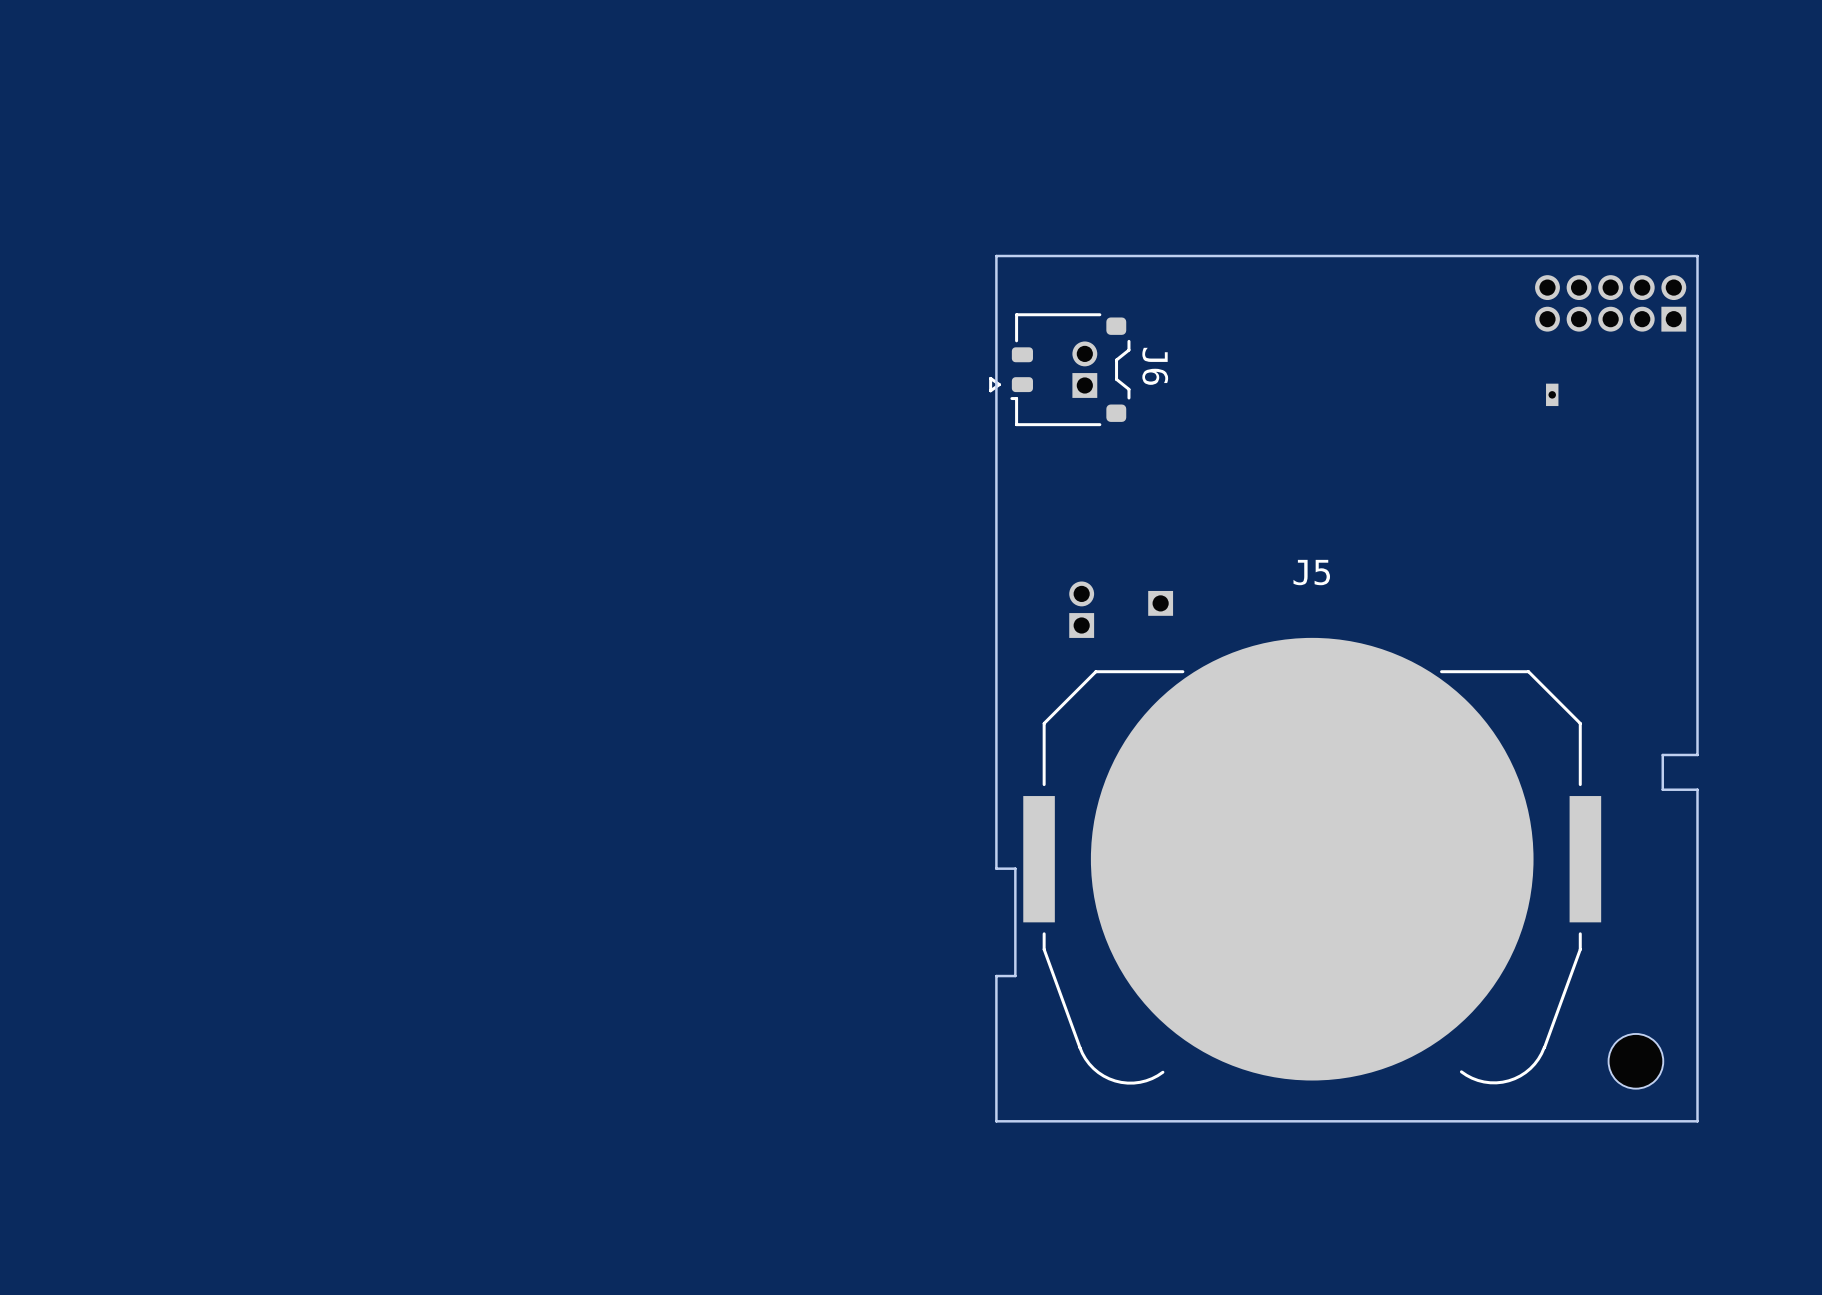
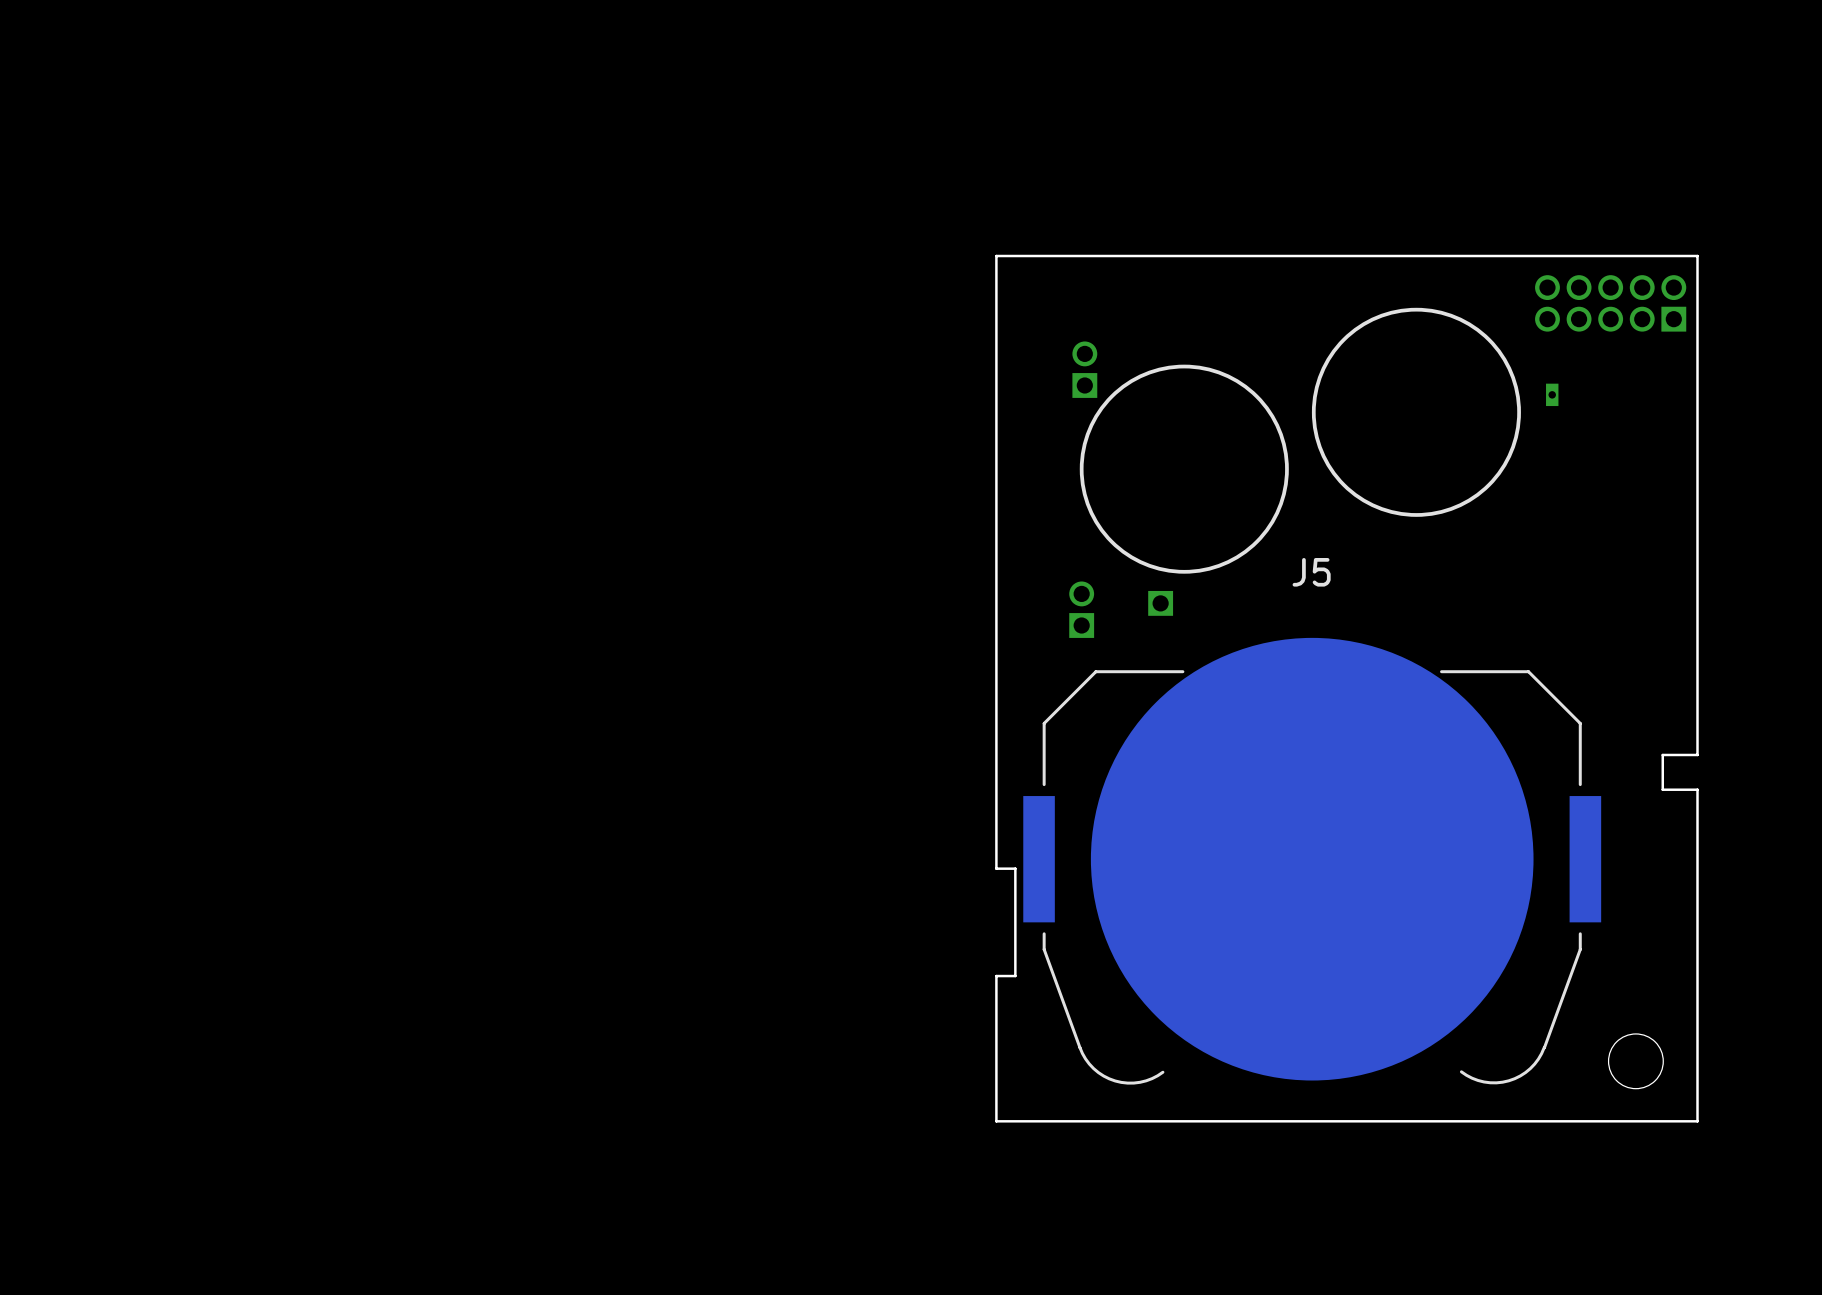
drawing: none -> [1079, 307, 1521, 574]
J6: (1059, 369) -> none

